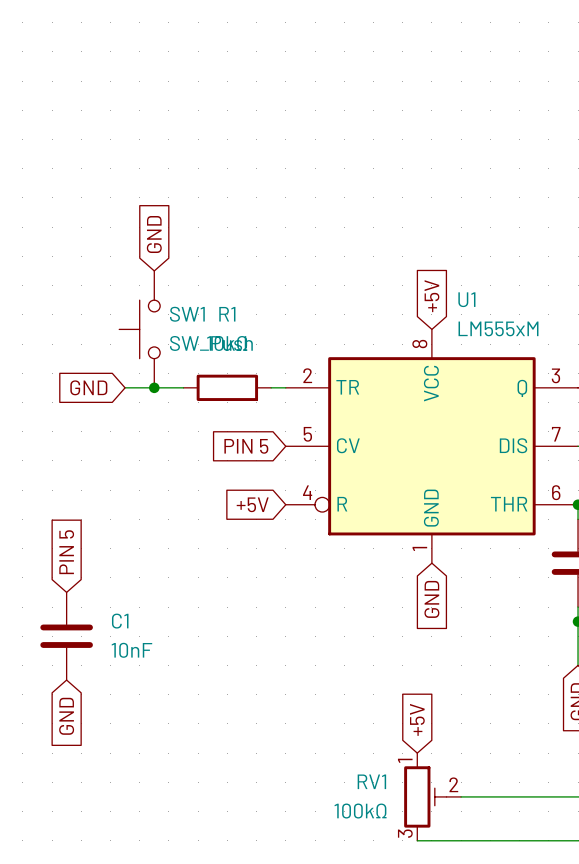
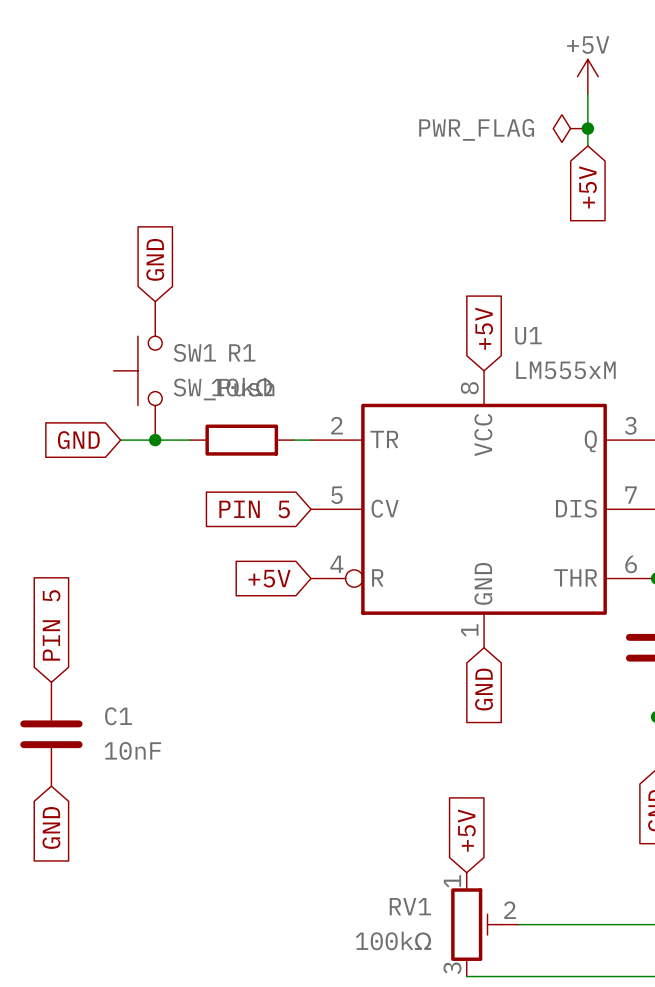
power symbol: none -> +5V (587, 76)
wire: none -> (587, 93) (587, 145)
power symbol: none -> PWR_FLAG (570, 128)
junction: none -> (587, 128)
global label: none -> +5V (588, 187)

